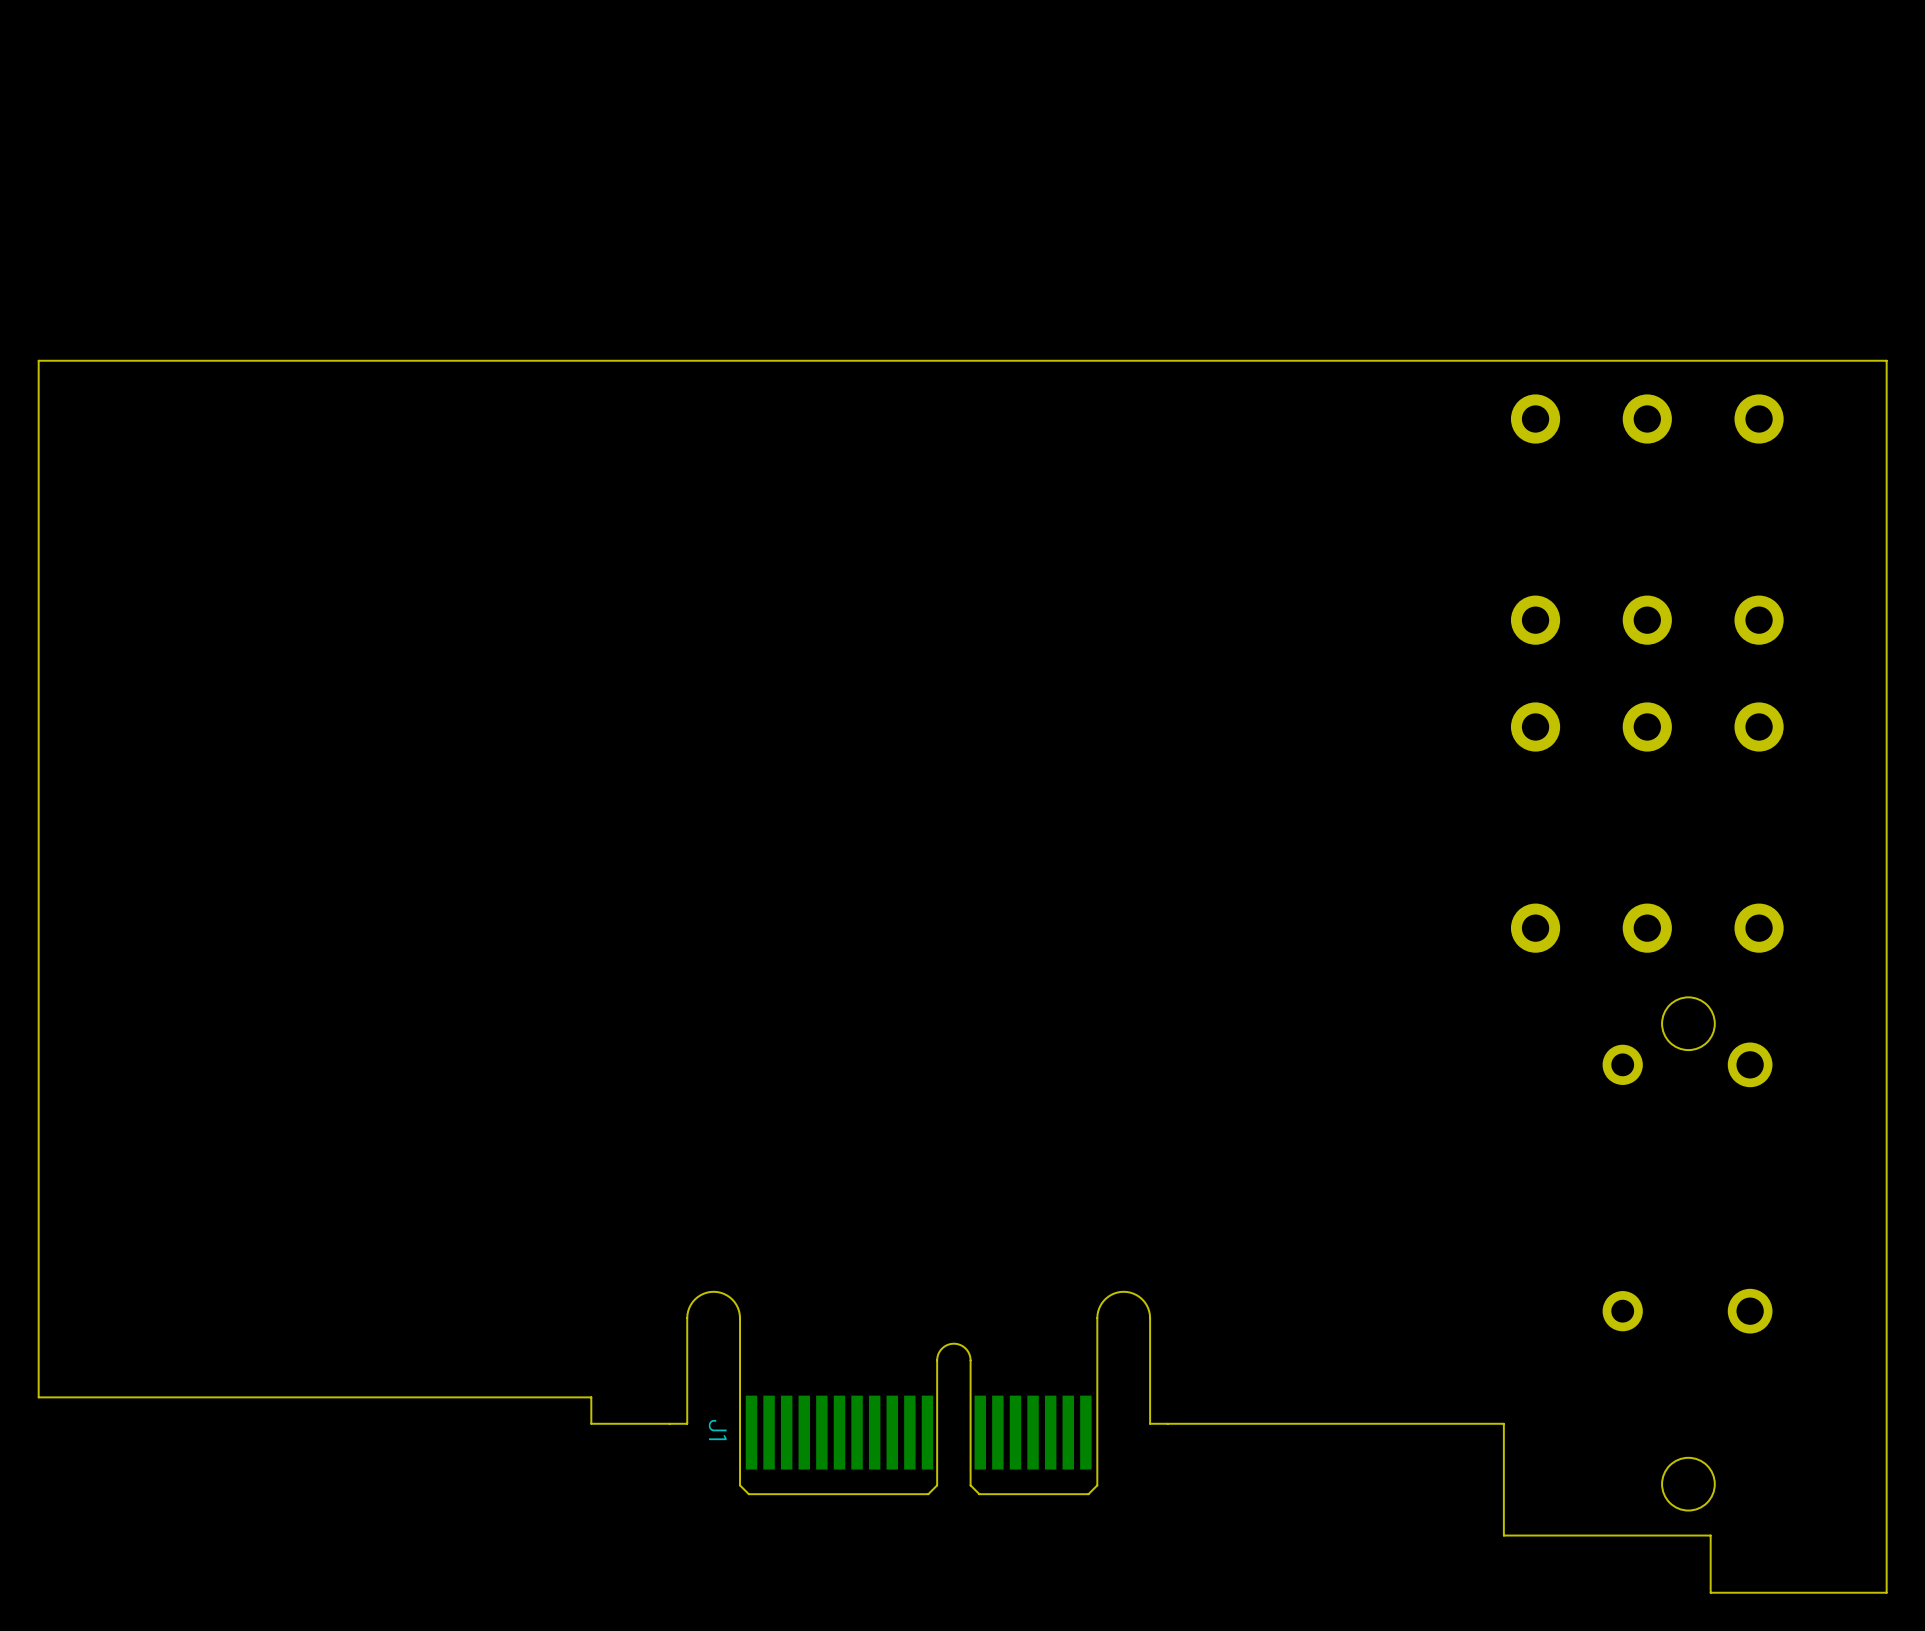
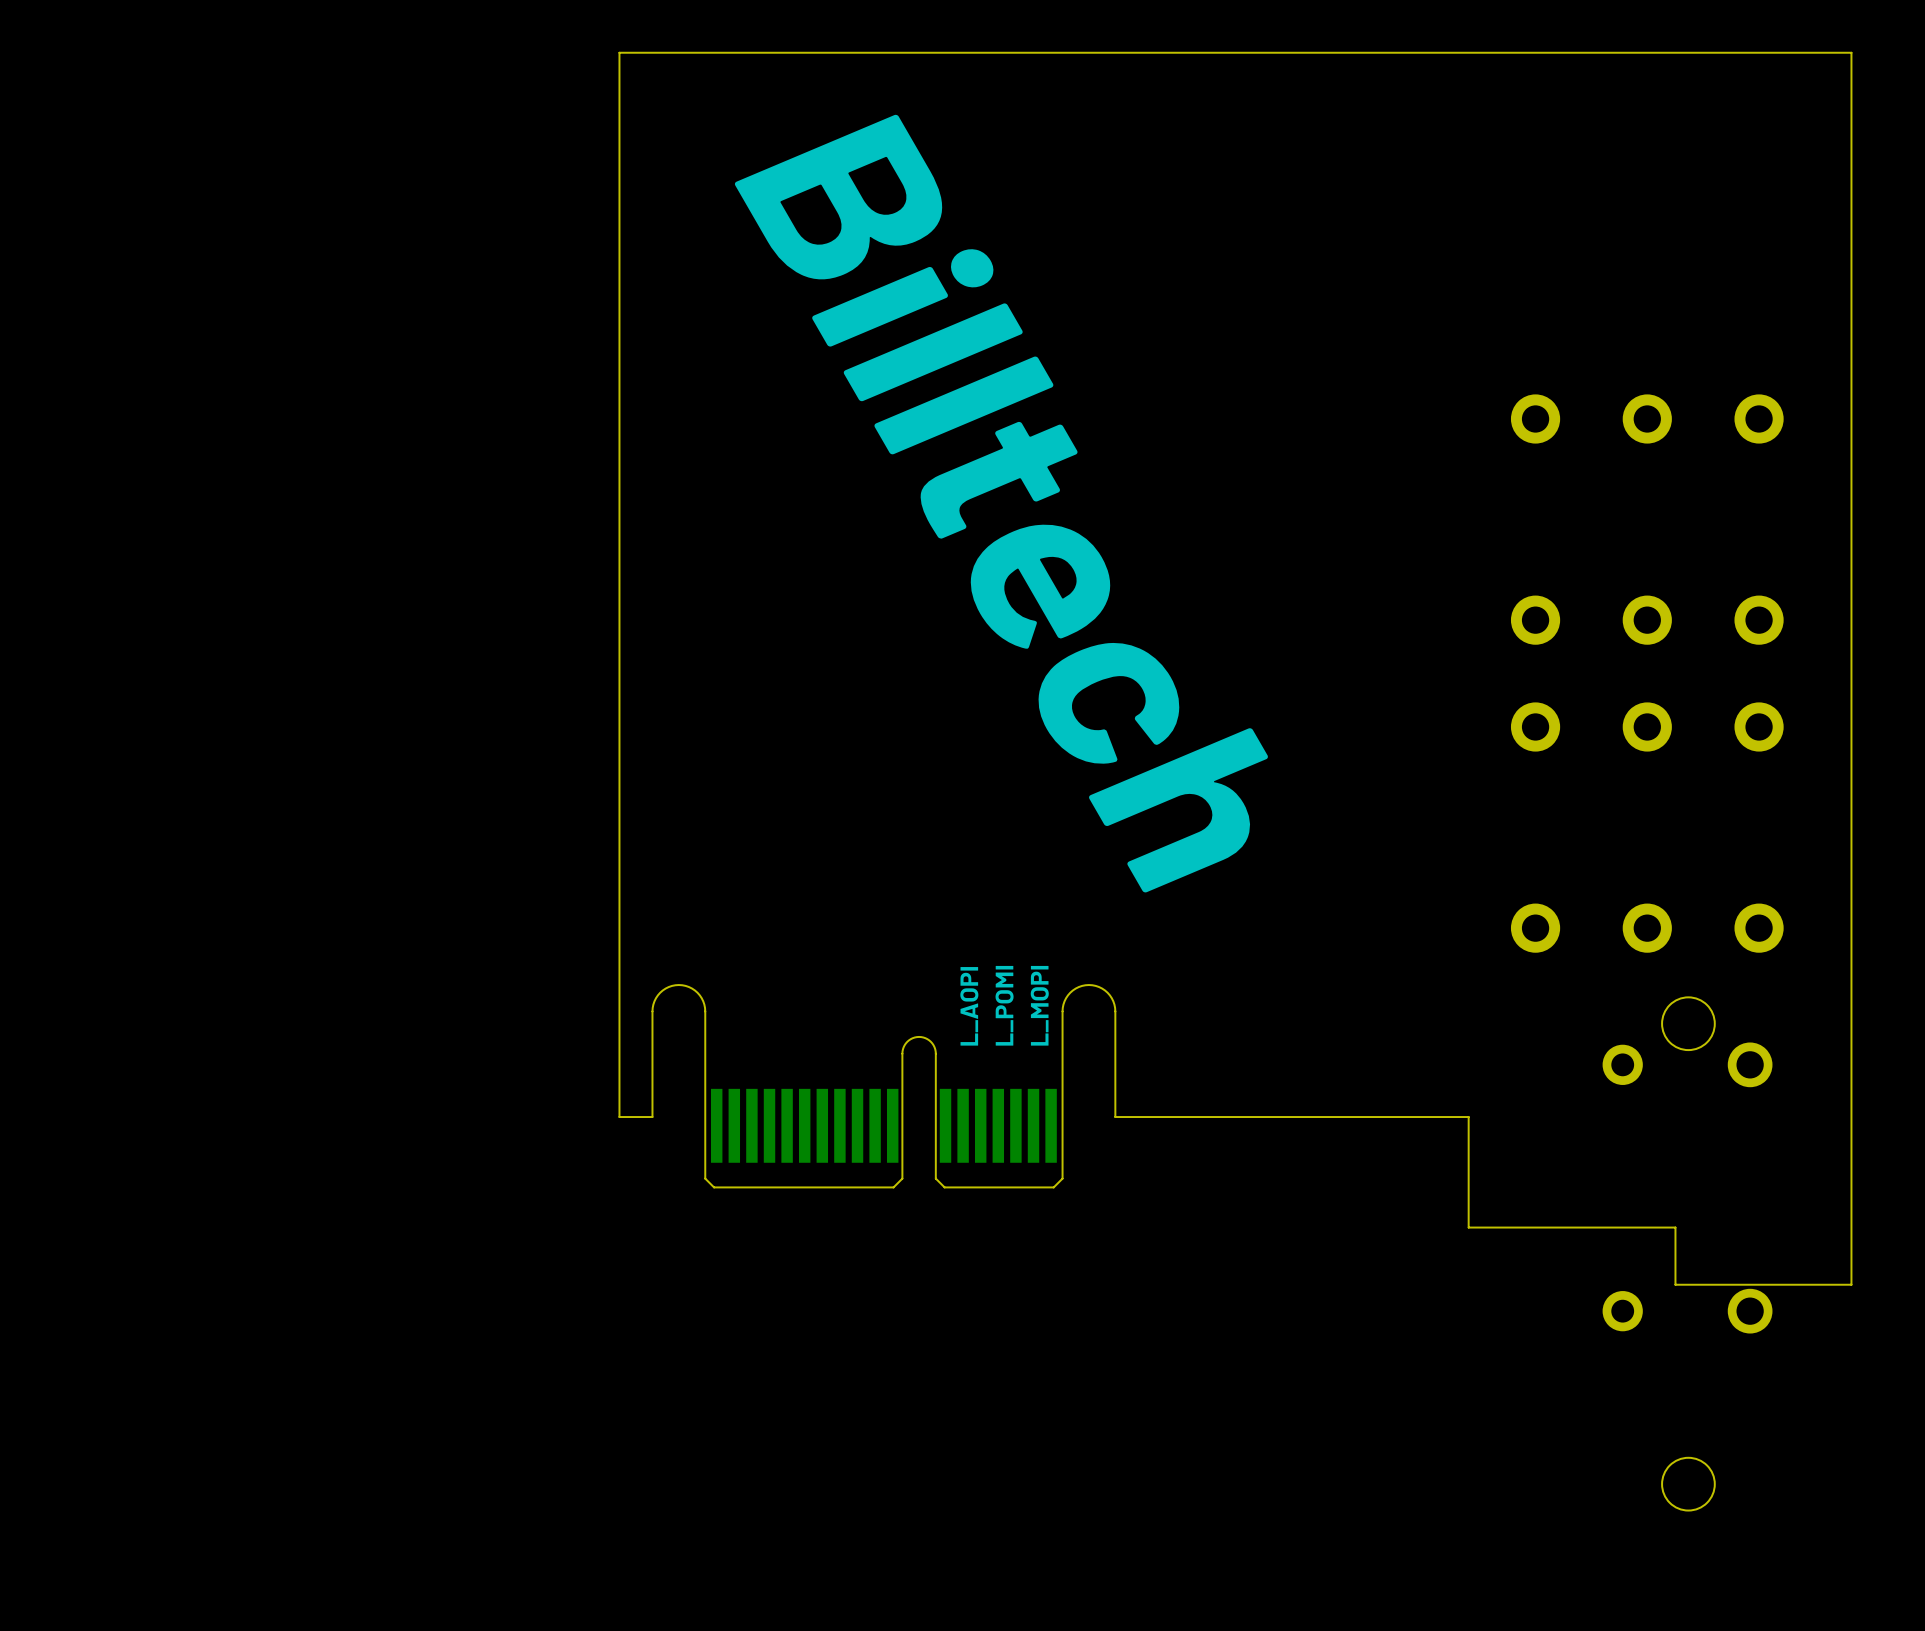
text: none -> Billtech (1001, 503)
text: none -> L_POMI (1004, 1005)
text: none -> L_MOPI (1039, 1005)
text: none -> L_AOPI (969, 1006)
part: none -> (883, 1086)
board edge: none -> (1115, 1117) (1468, 1117) (1468, 1227) (1675, 1227) (1675, 1284) (1851, 1284) (1851, 52) (619, 52) (619, 1117) (652, 1117)
J1: (918, 1392) -> none
board edge: (1167, 1423) (1503, 1423) (1503, 1535) (1710, 1535) (1710, 1592) (1886, 1592) (1886, 360) (38, 360) (38, 1397) (591, 1397) (591, 1423) (669, 1423) -> none

